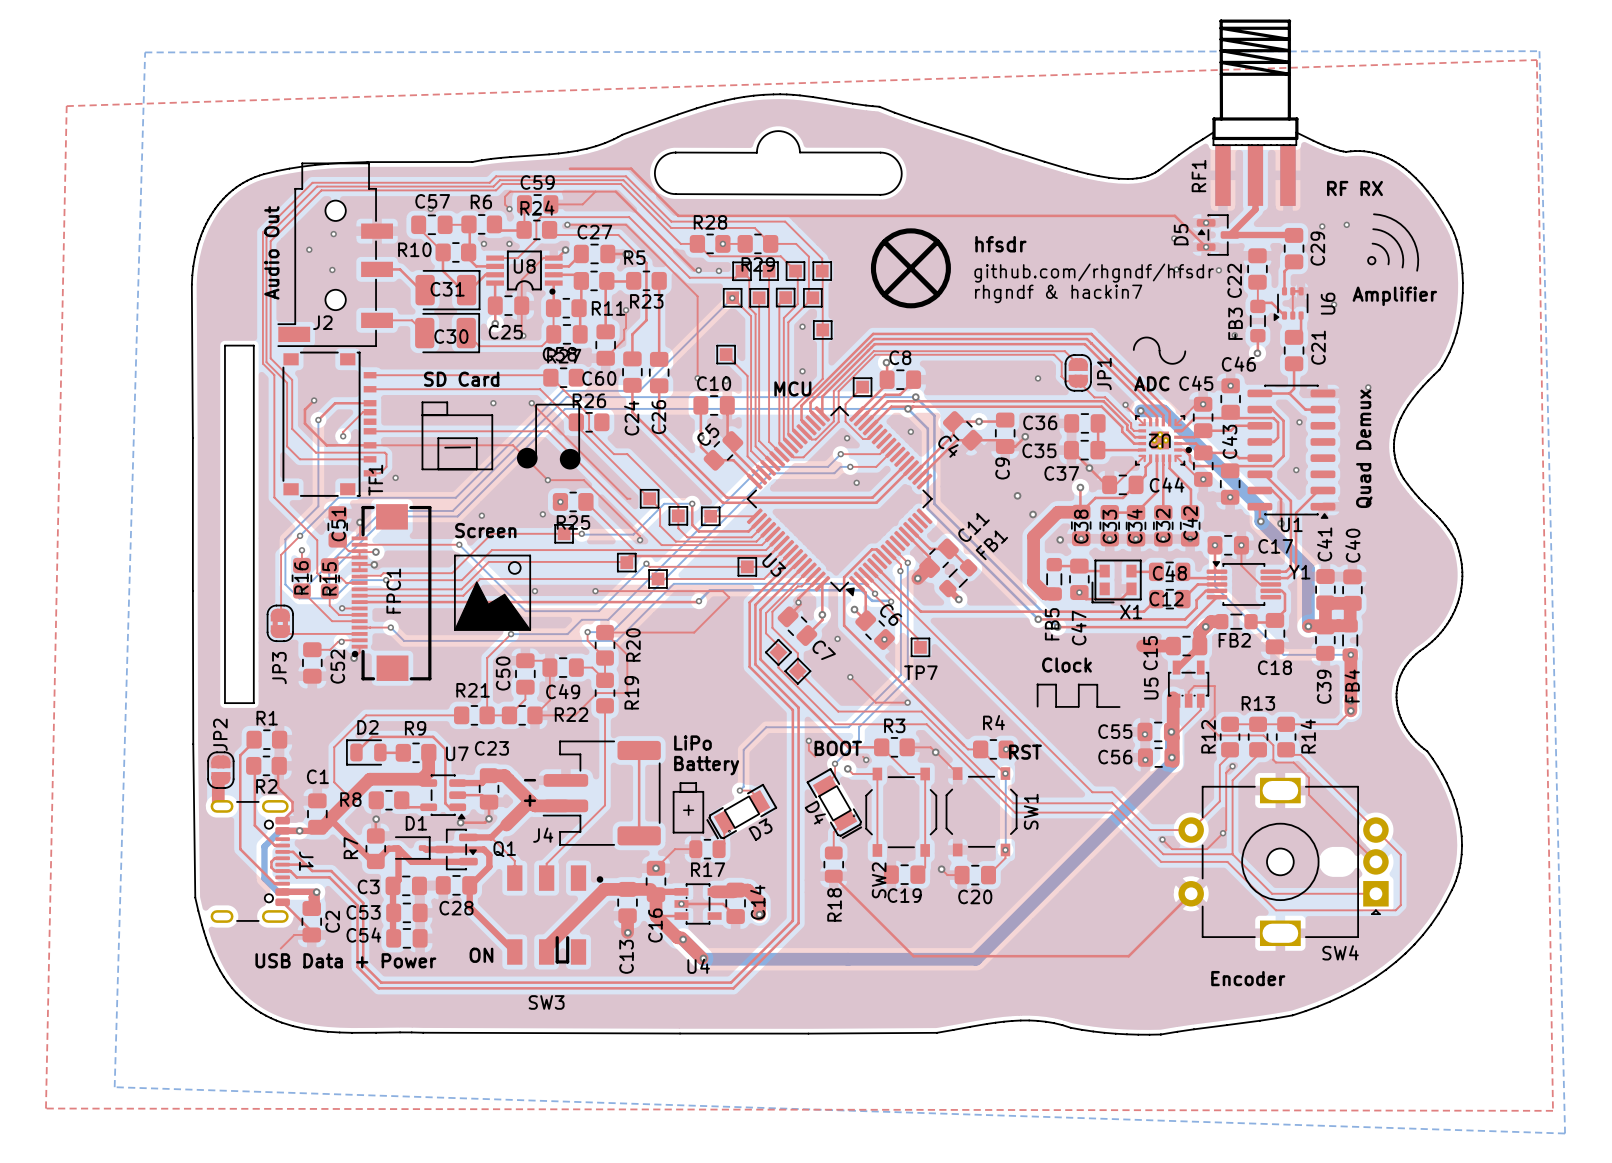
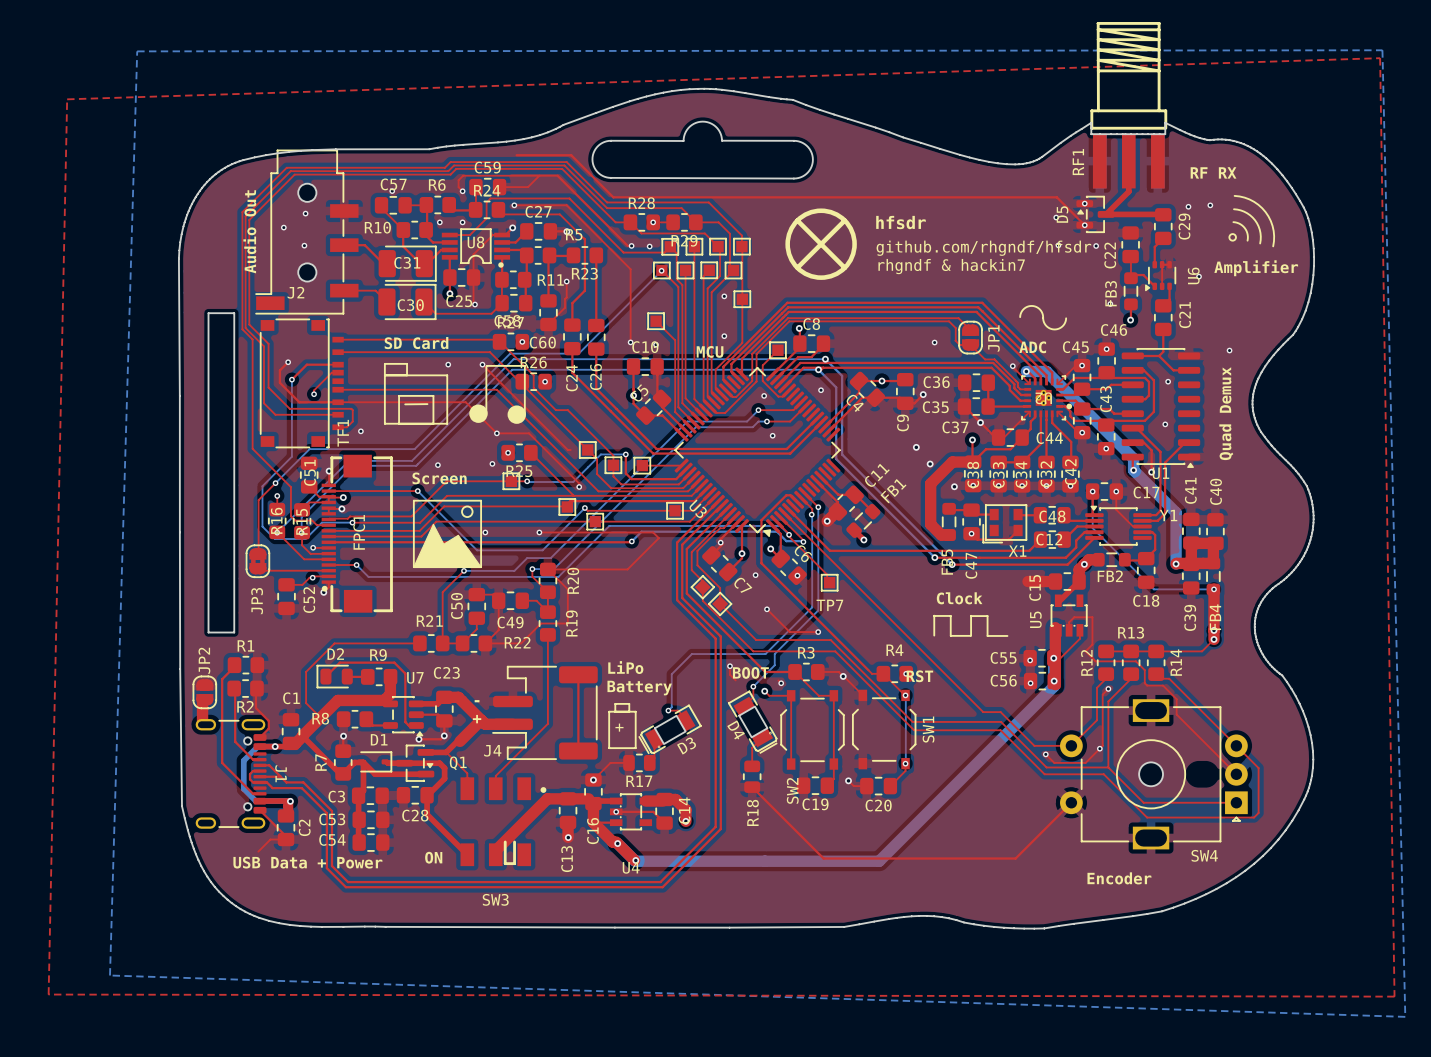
via: none -> (522, 341)
via: none -> (545, 381)

